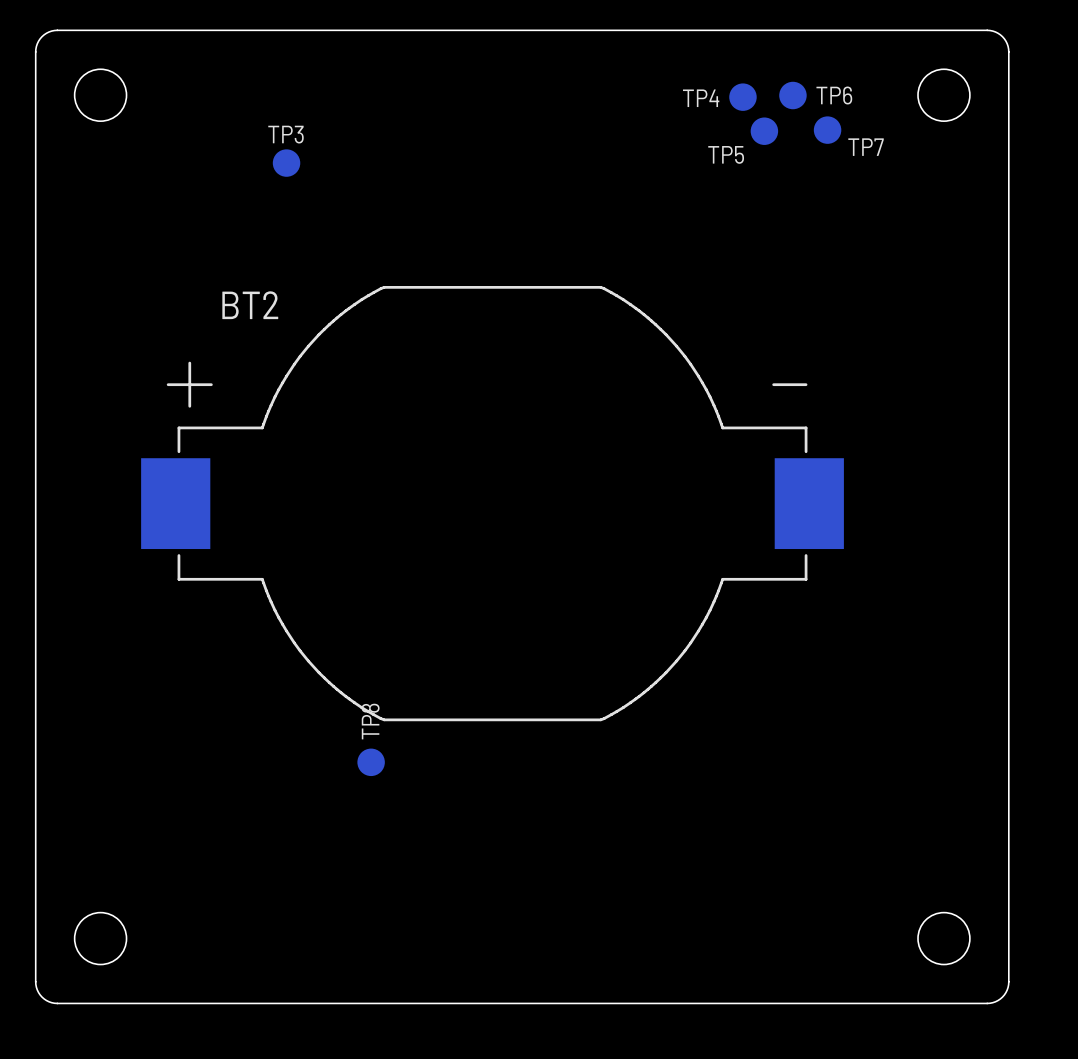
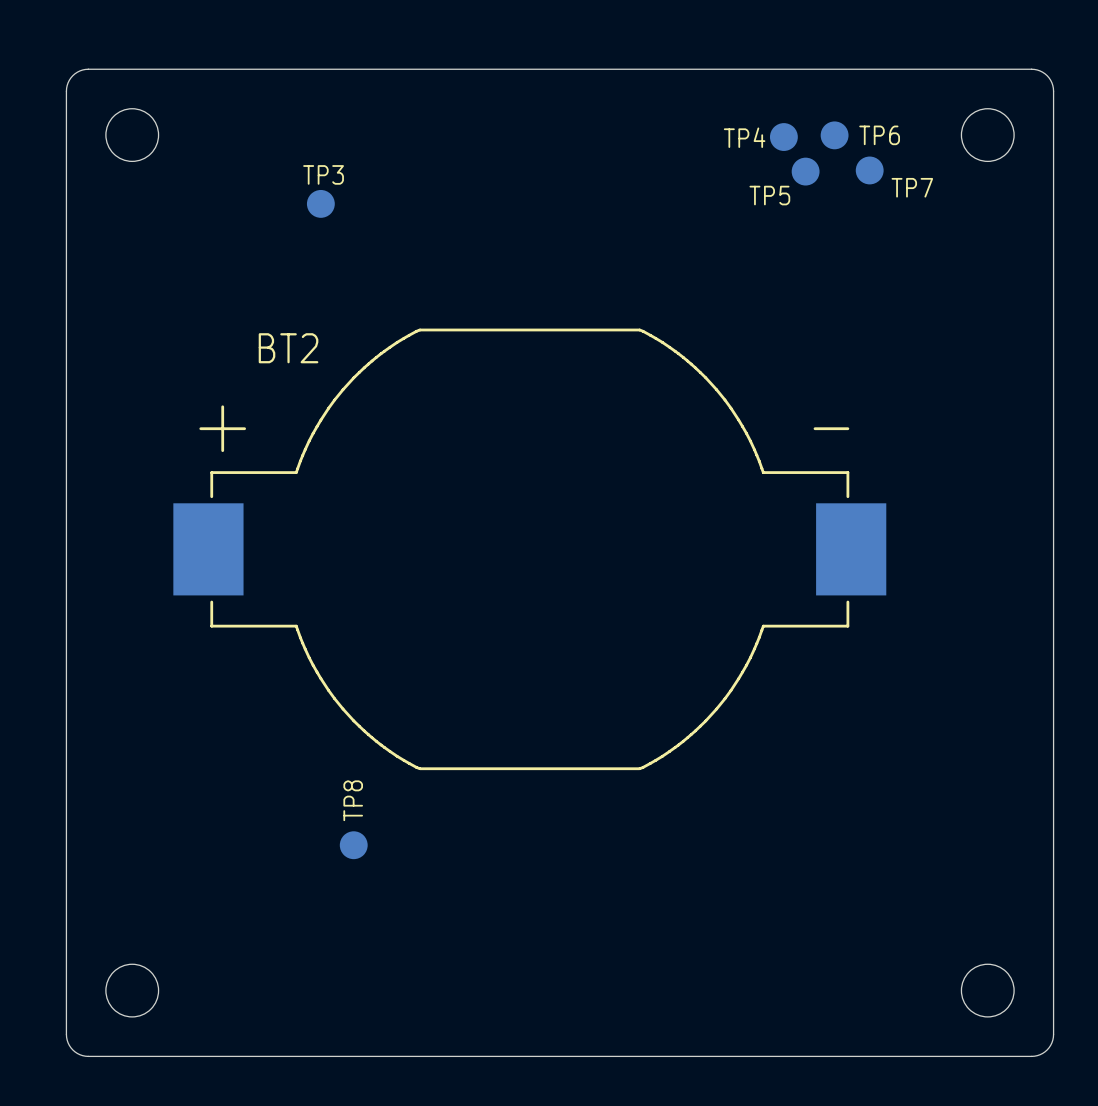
TP8 position: (371, 762) -> (353, 845)

